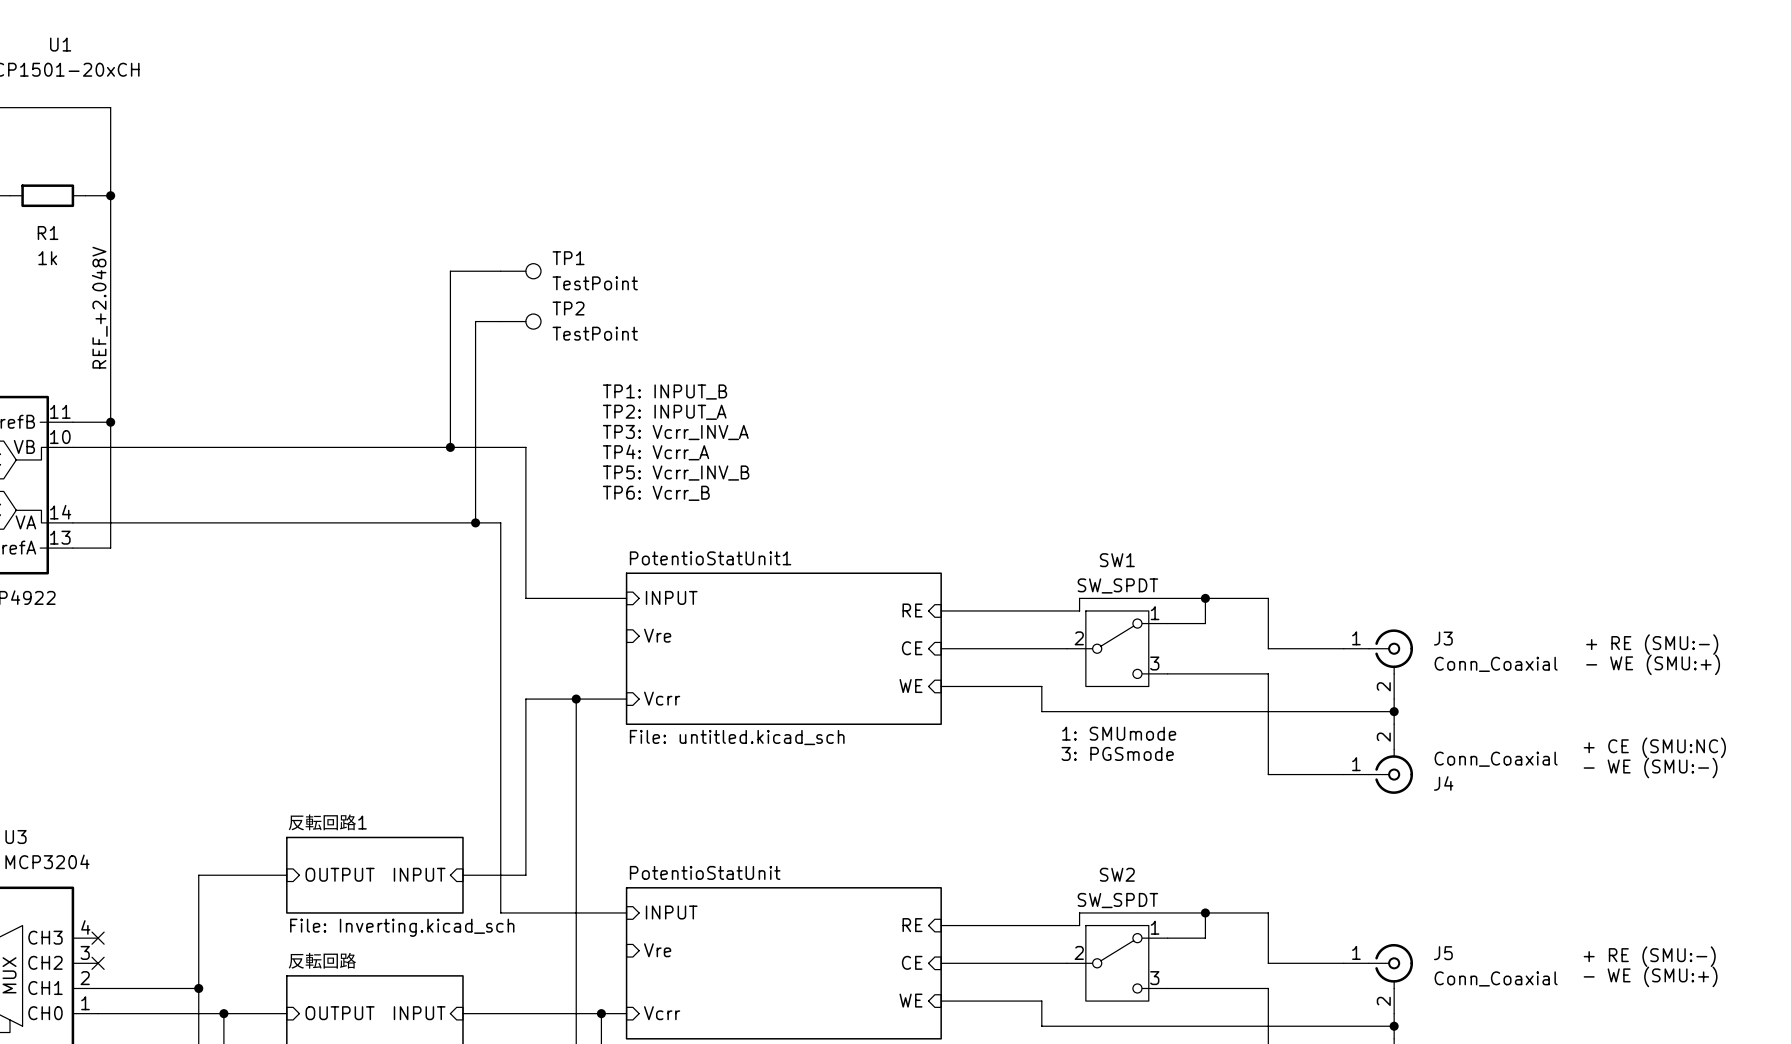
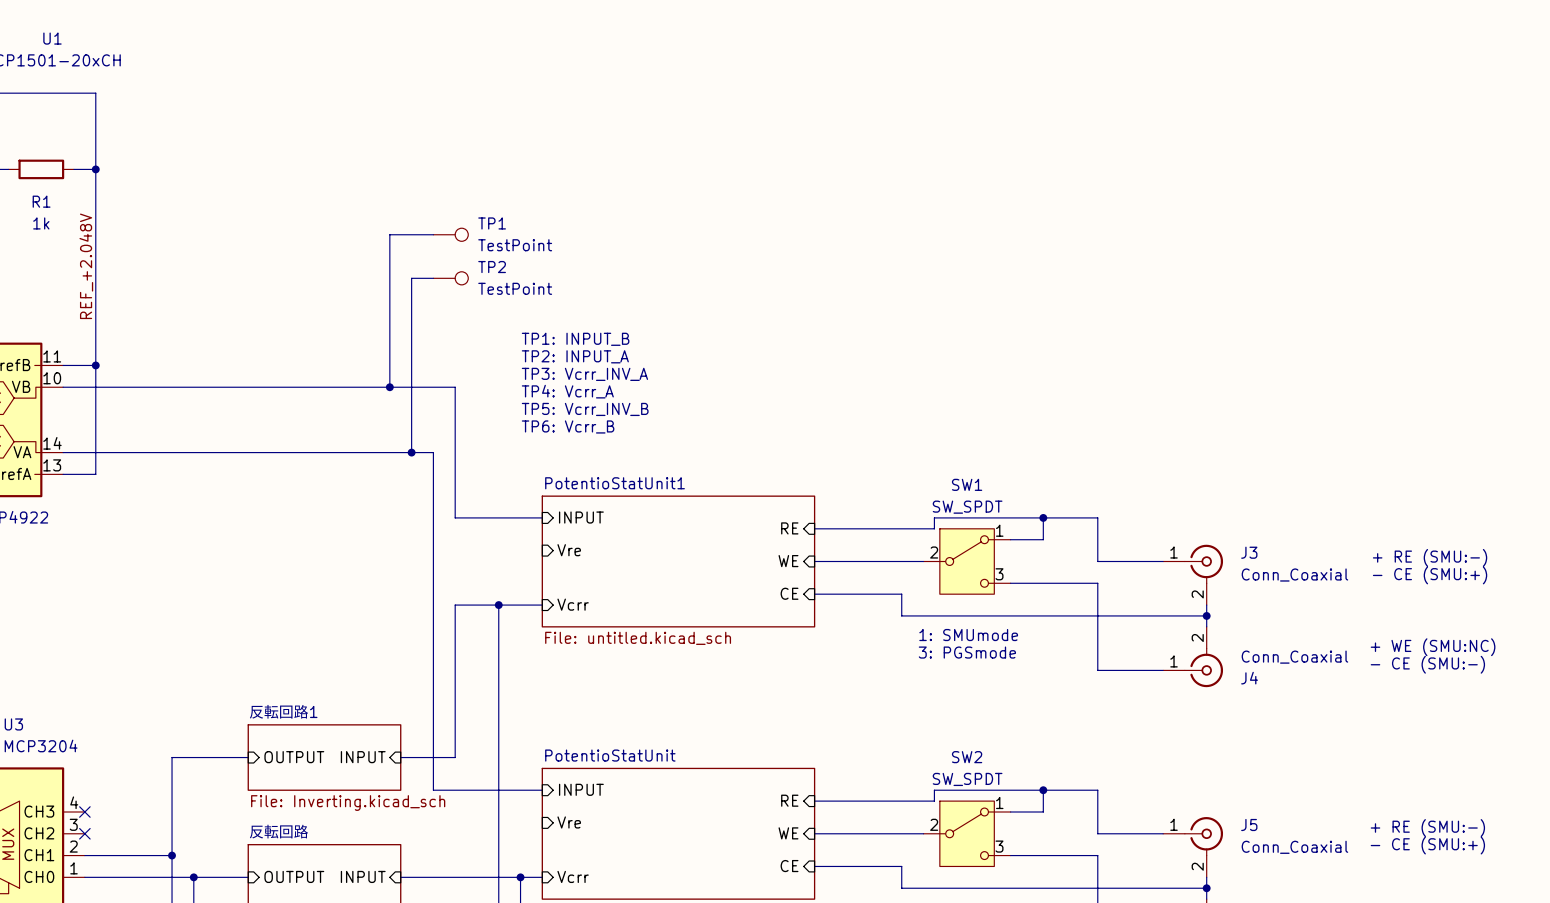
sheet pin: CE (912, 648) -> WE (788, 561)
text: - WE (SMU:+) (1653, 664) -> - CE (SMU:+) (1430, 575)
sheet pin: WE (911, 686) -> CE (789, 593)
text: + CE (SMU:NC) (1654, 747) -> + WE (SMU:NC) (1433, 647)
text: - WE (SMU:-) (1650, 768) -> - CE (SMU:-) (1427, 664)
sheet pin: CE (912, 962) -> WE (788, 833)
text: - WE (SMU:+) (1650, 976) -> - CE (SMU:+) (1427, 845)
sheet pin: WE (911, 1000) -> CE (789, 866)

